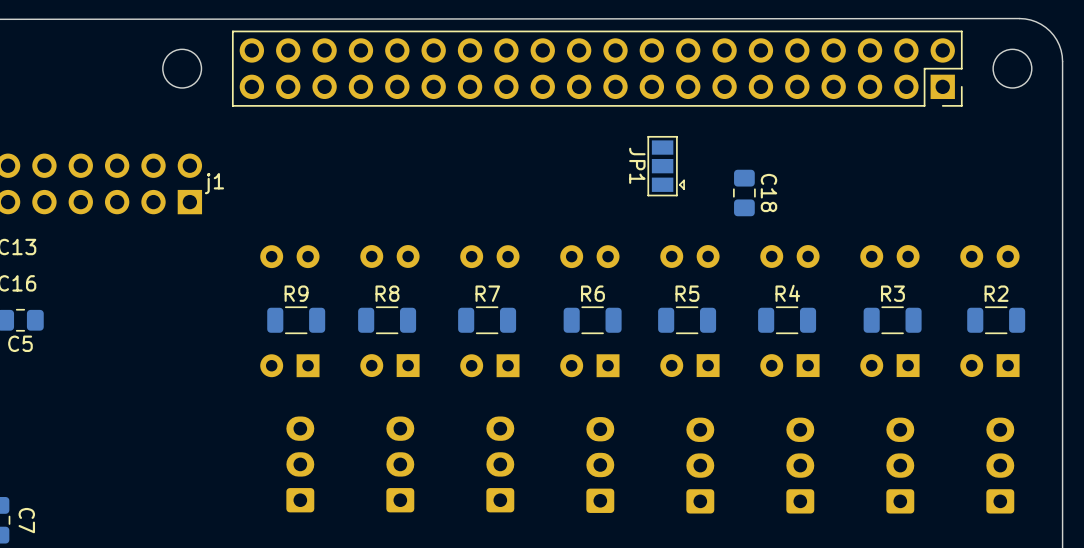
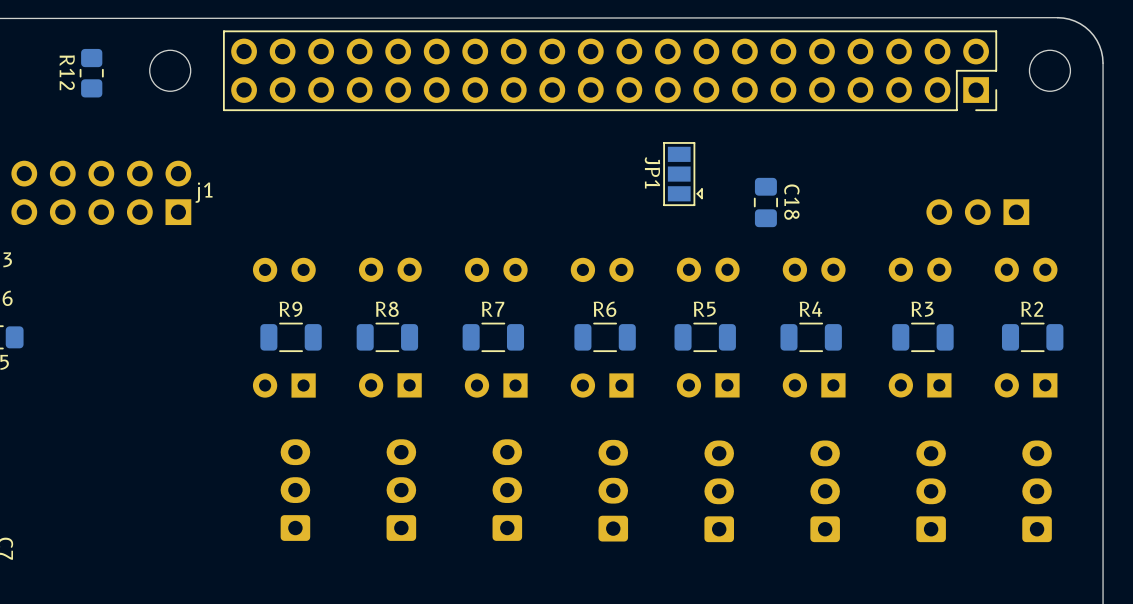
R12: none -> (91, 73)
part: none -> (977, 212)

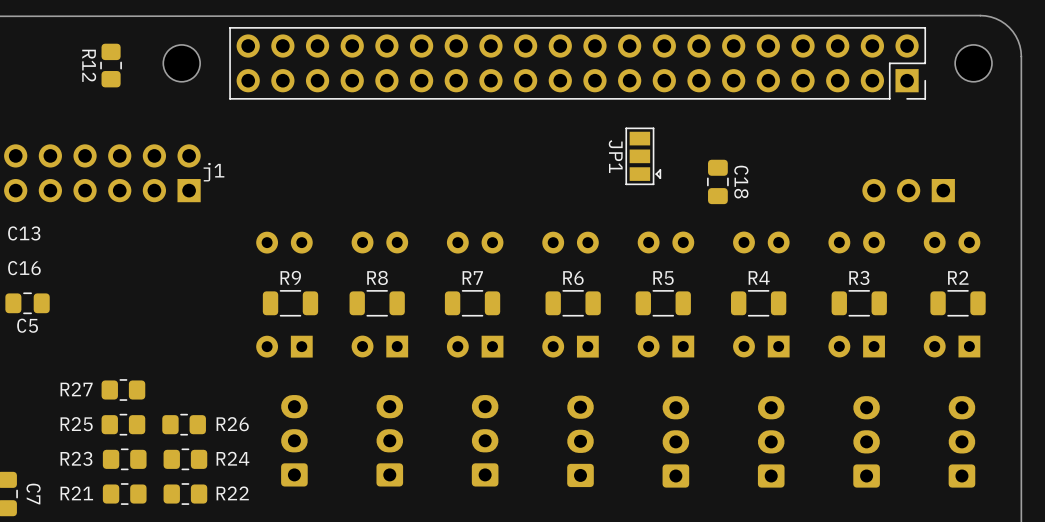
R27: none -> (123, 389)
R25: none -> (123, 424)
R26: none -> (184, 424)
R23: none -> (124, 459)
R24: none -> (185, 459)
R21: none -> (124, 494)
R22: none -> (185, 494)

